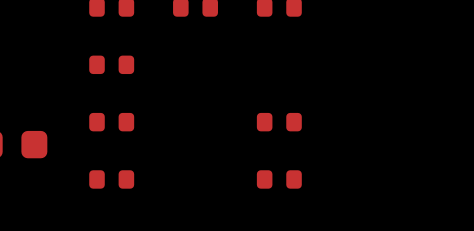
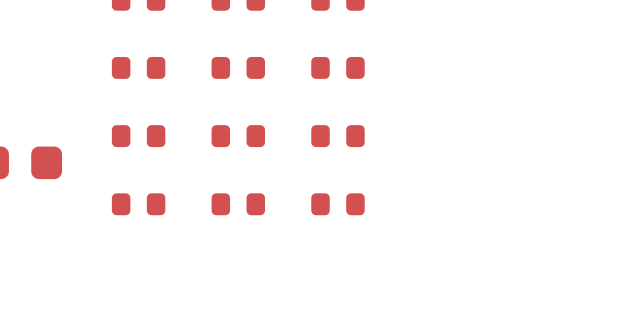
part: none -> (238, 67)
part: none -> (337, 67)
part: none -> (238, 136)
part: none -> (238, 204)

